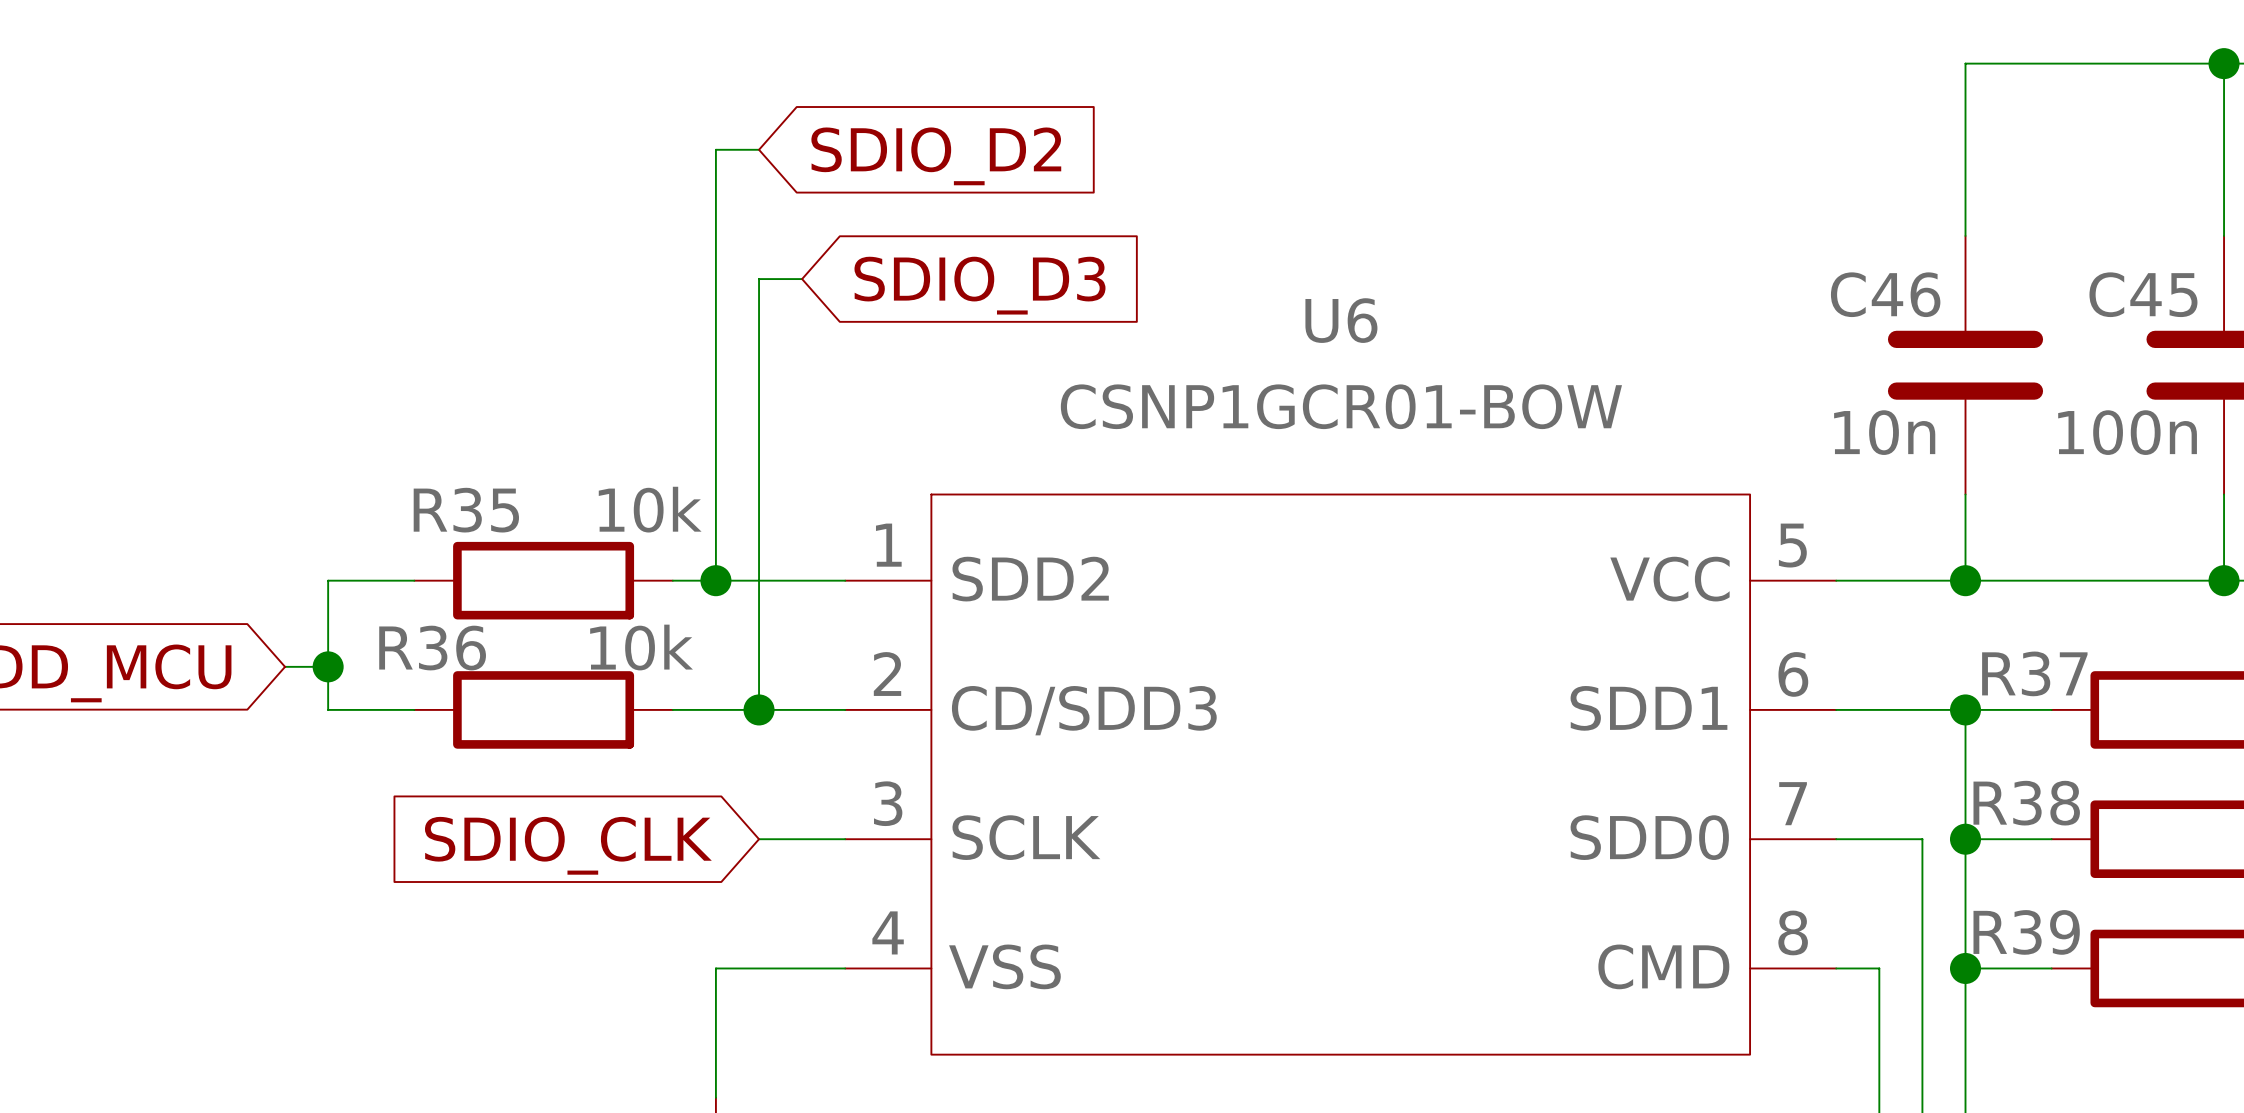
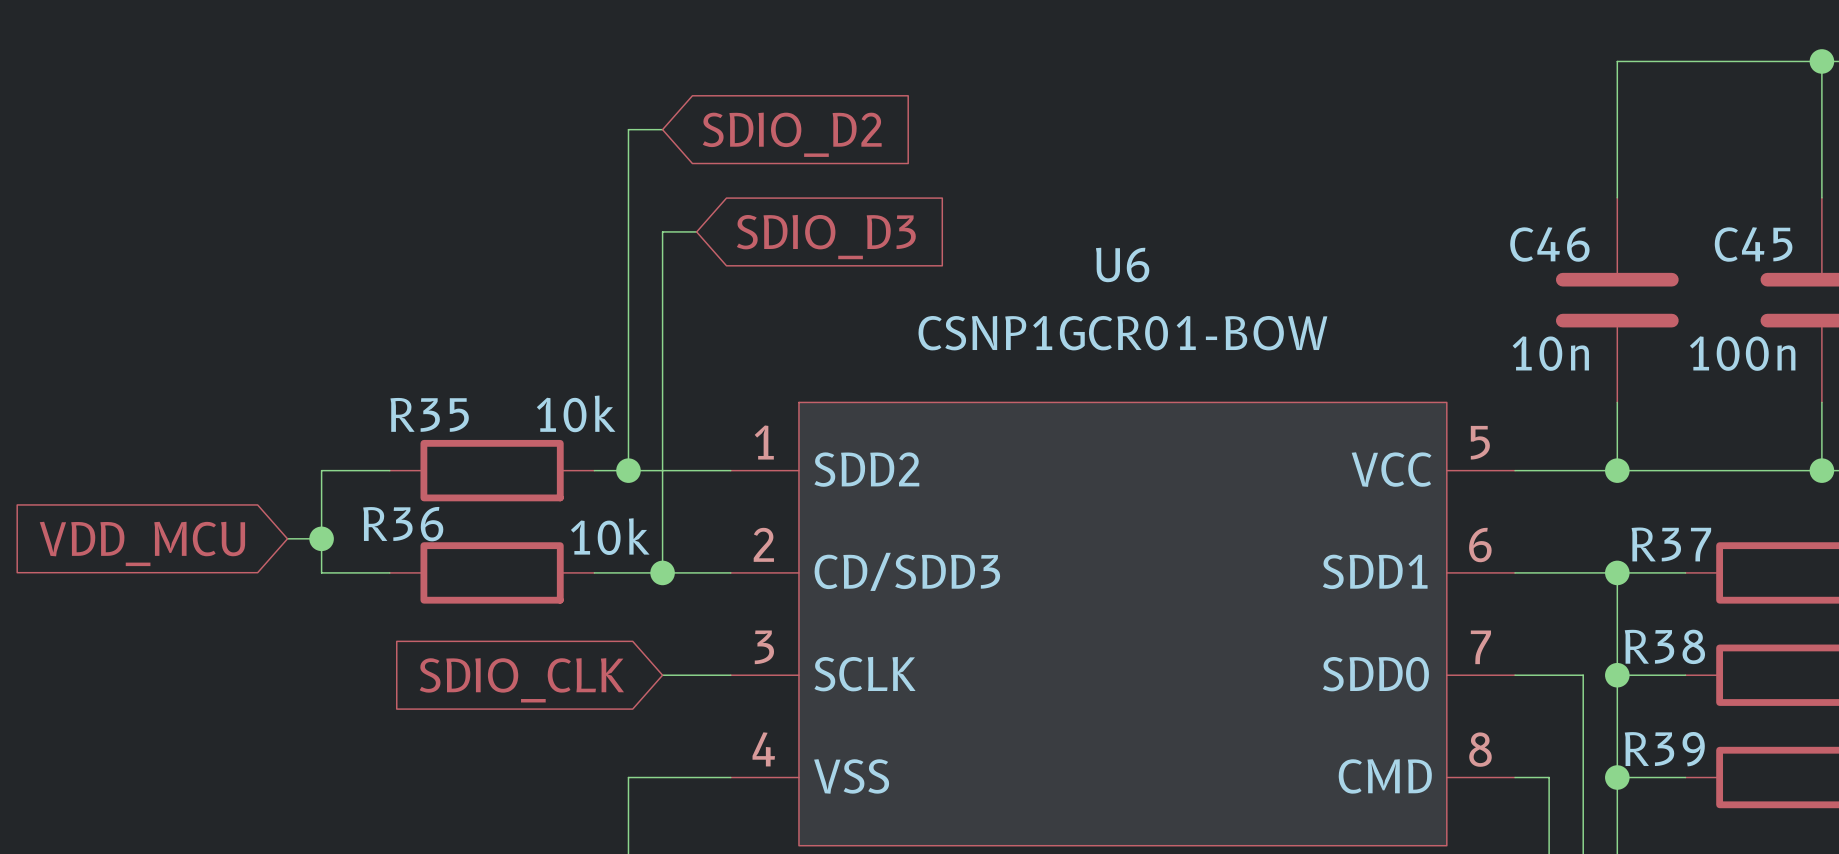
R36 value position: 10k (641, 647) -> 10k (610, 536)

